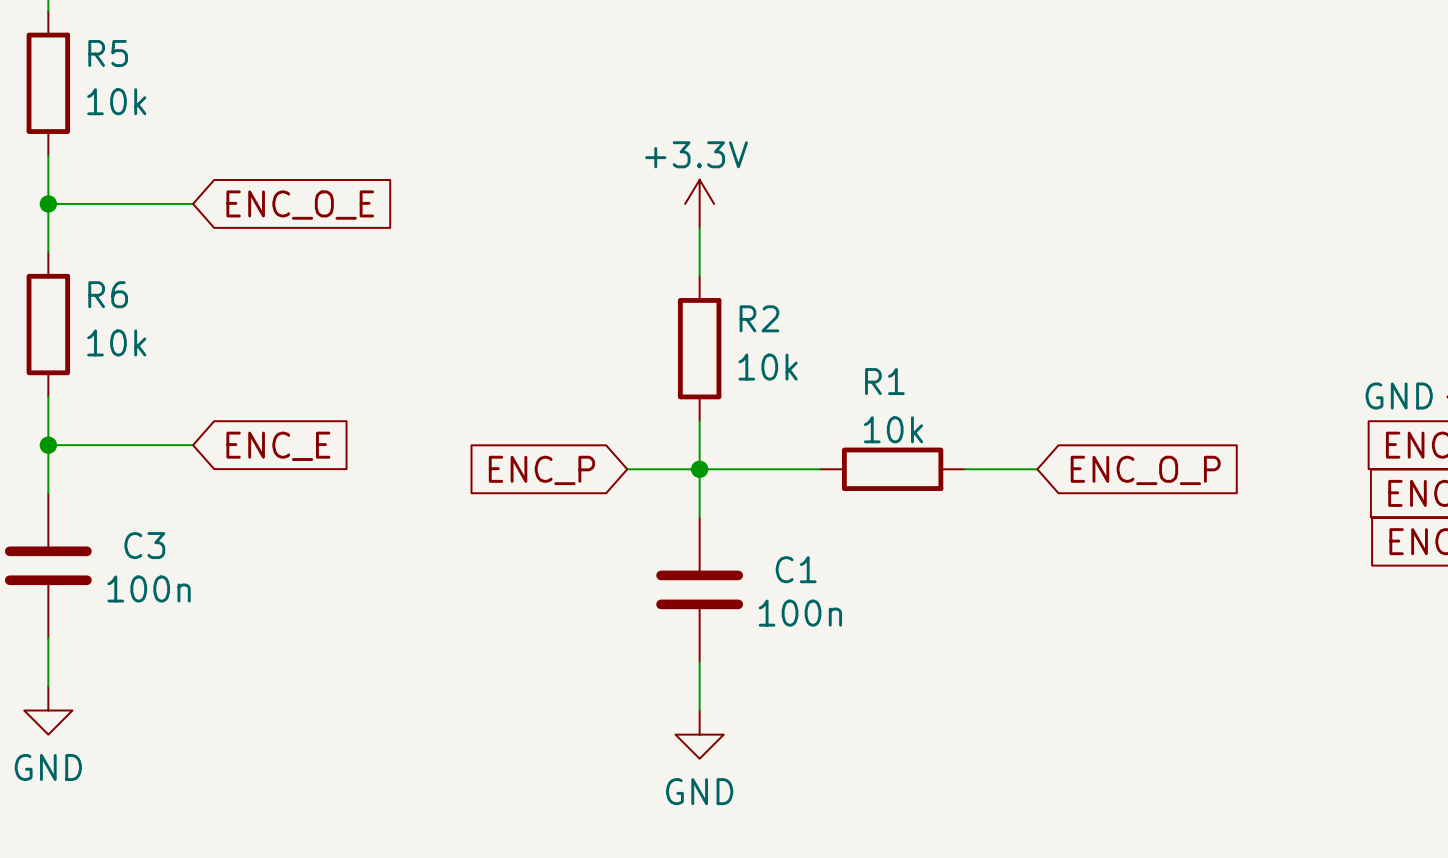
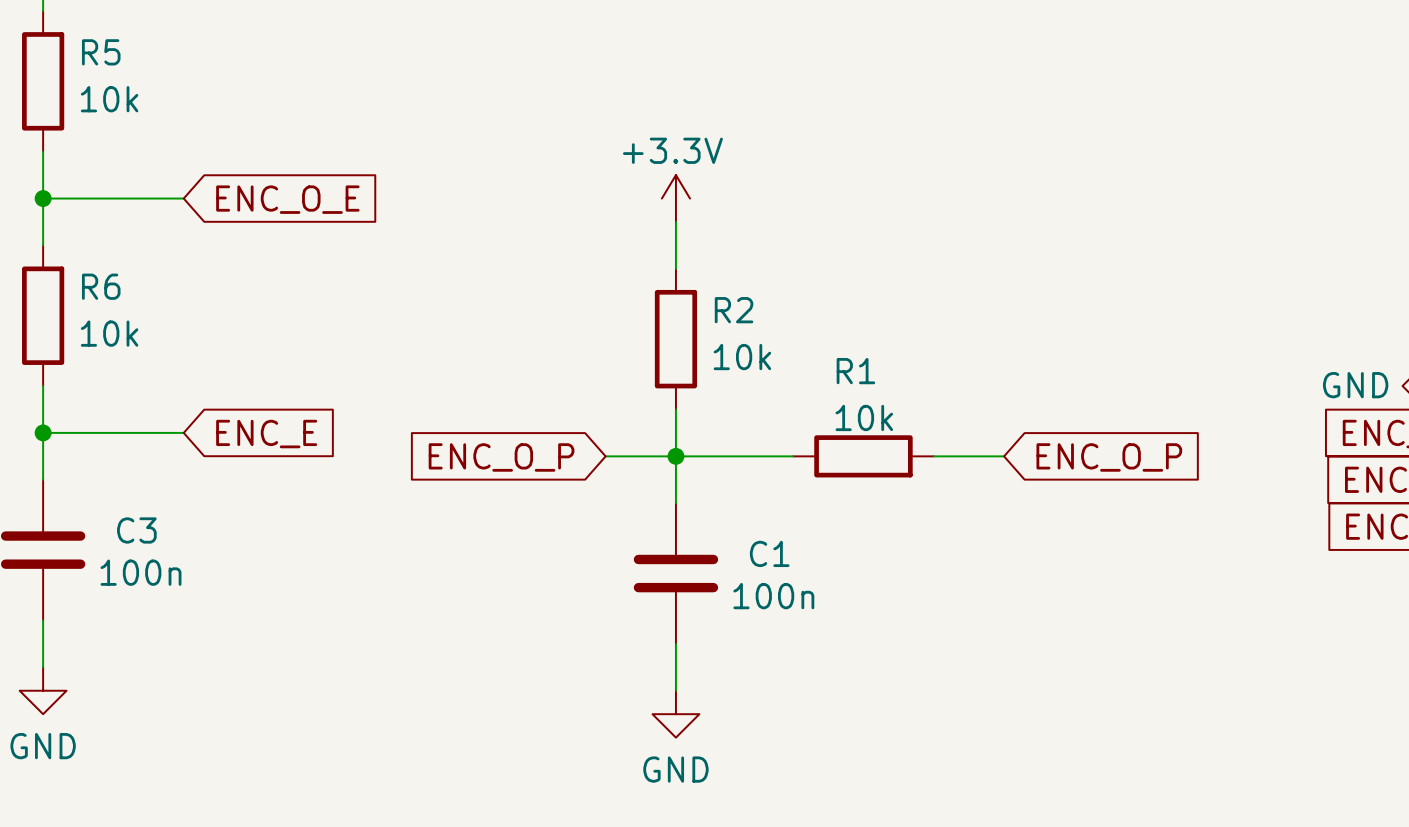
global label: ENC_P (541, 470) -> ENC_O_P (501, 457)

